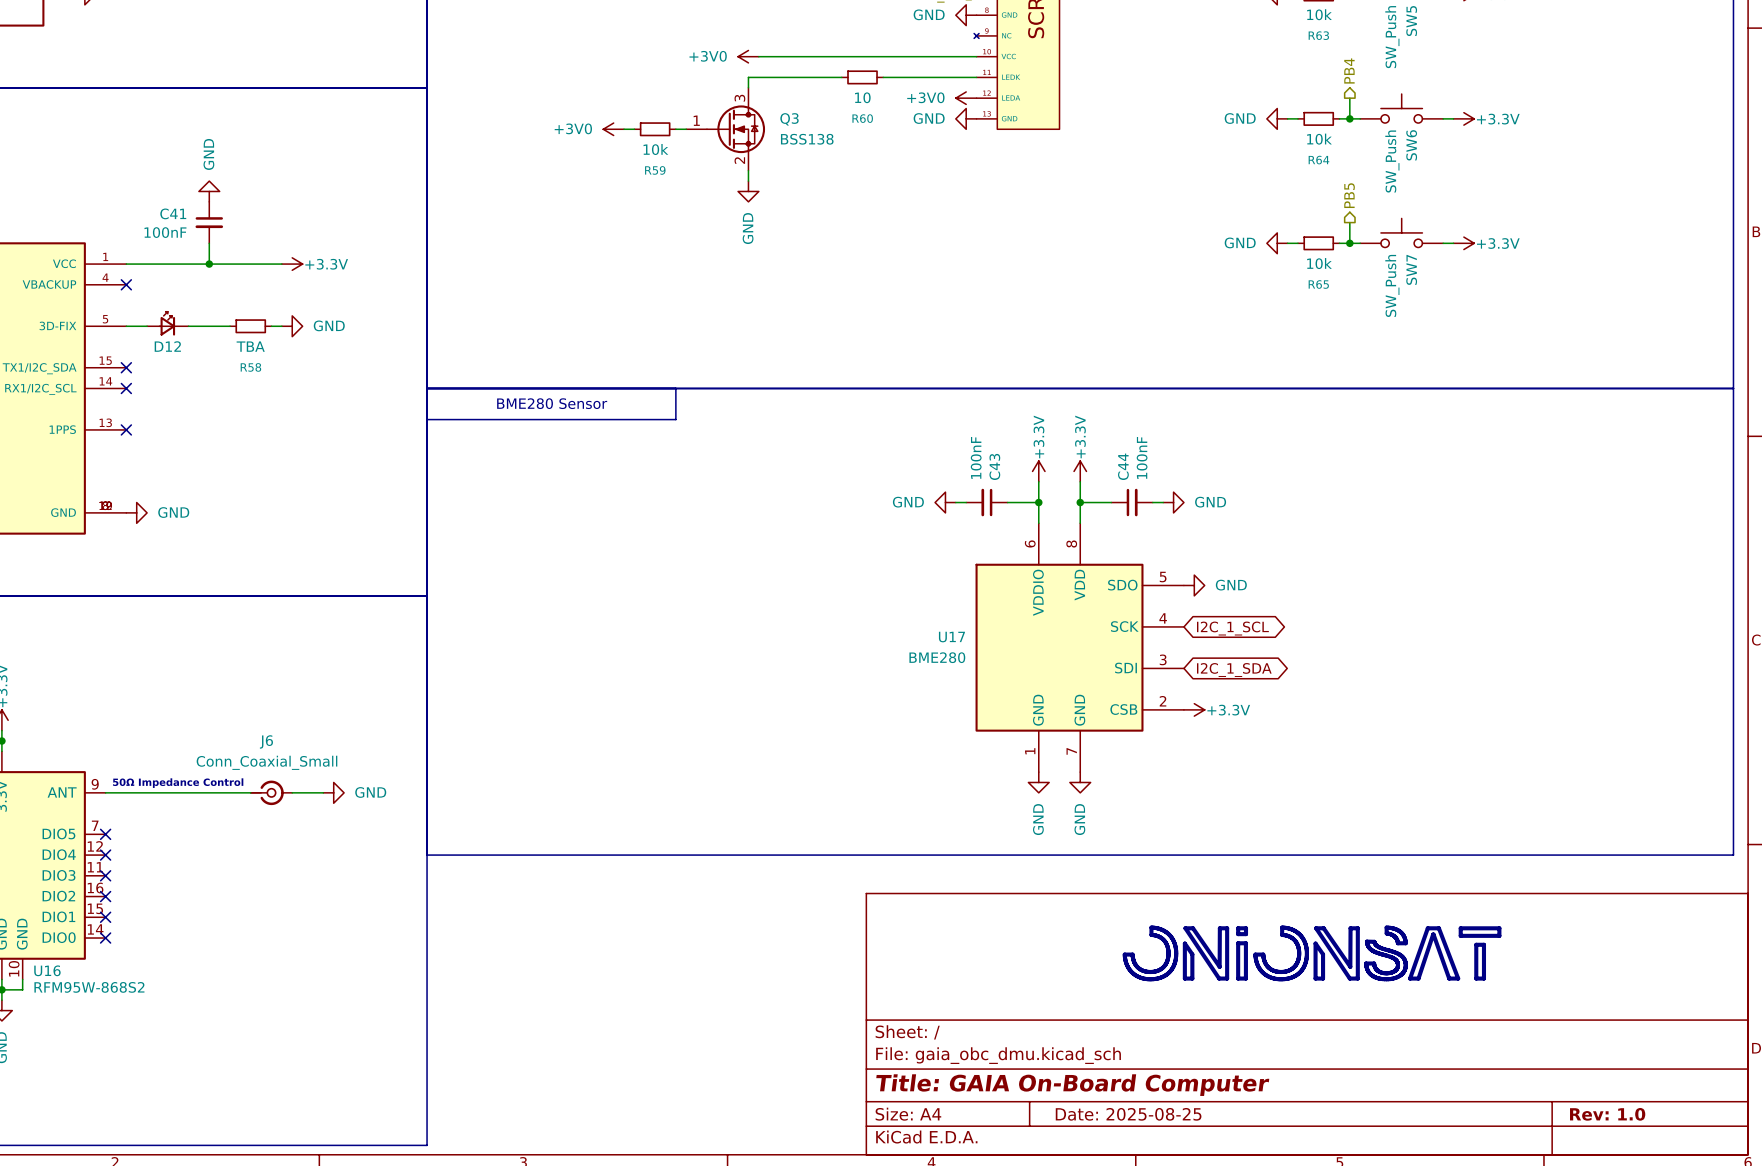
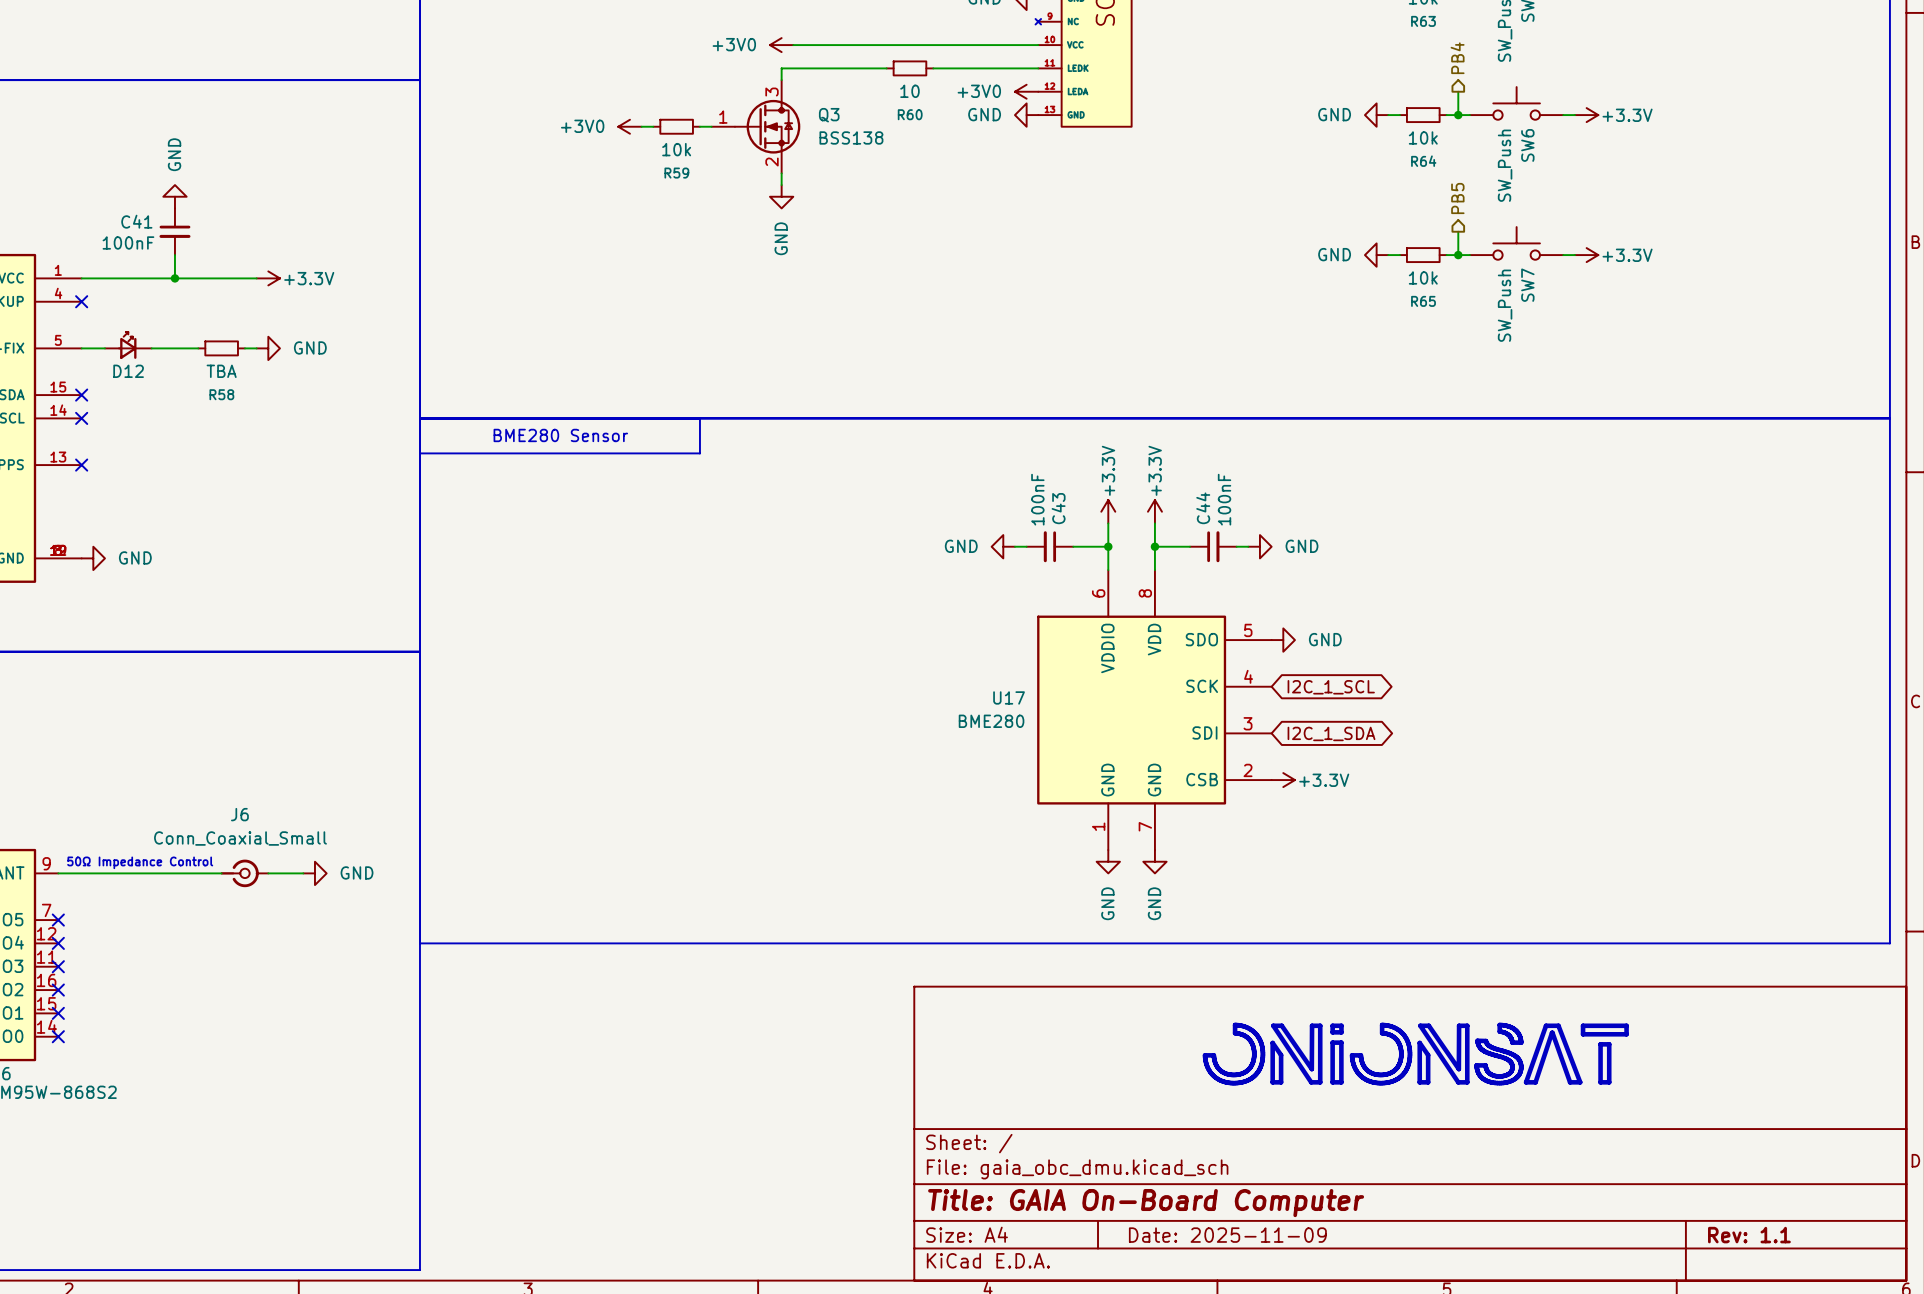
title block: Date: 2025-08-25 (1128, 1114) -> Date: 2025-11-09 (1227, 1235)
title block: Rev: 1.0 (1607, 1114) -> Rev: 1.1 (1749, 1235)

